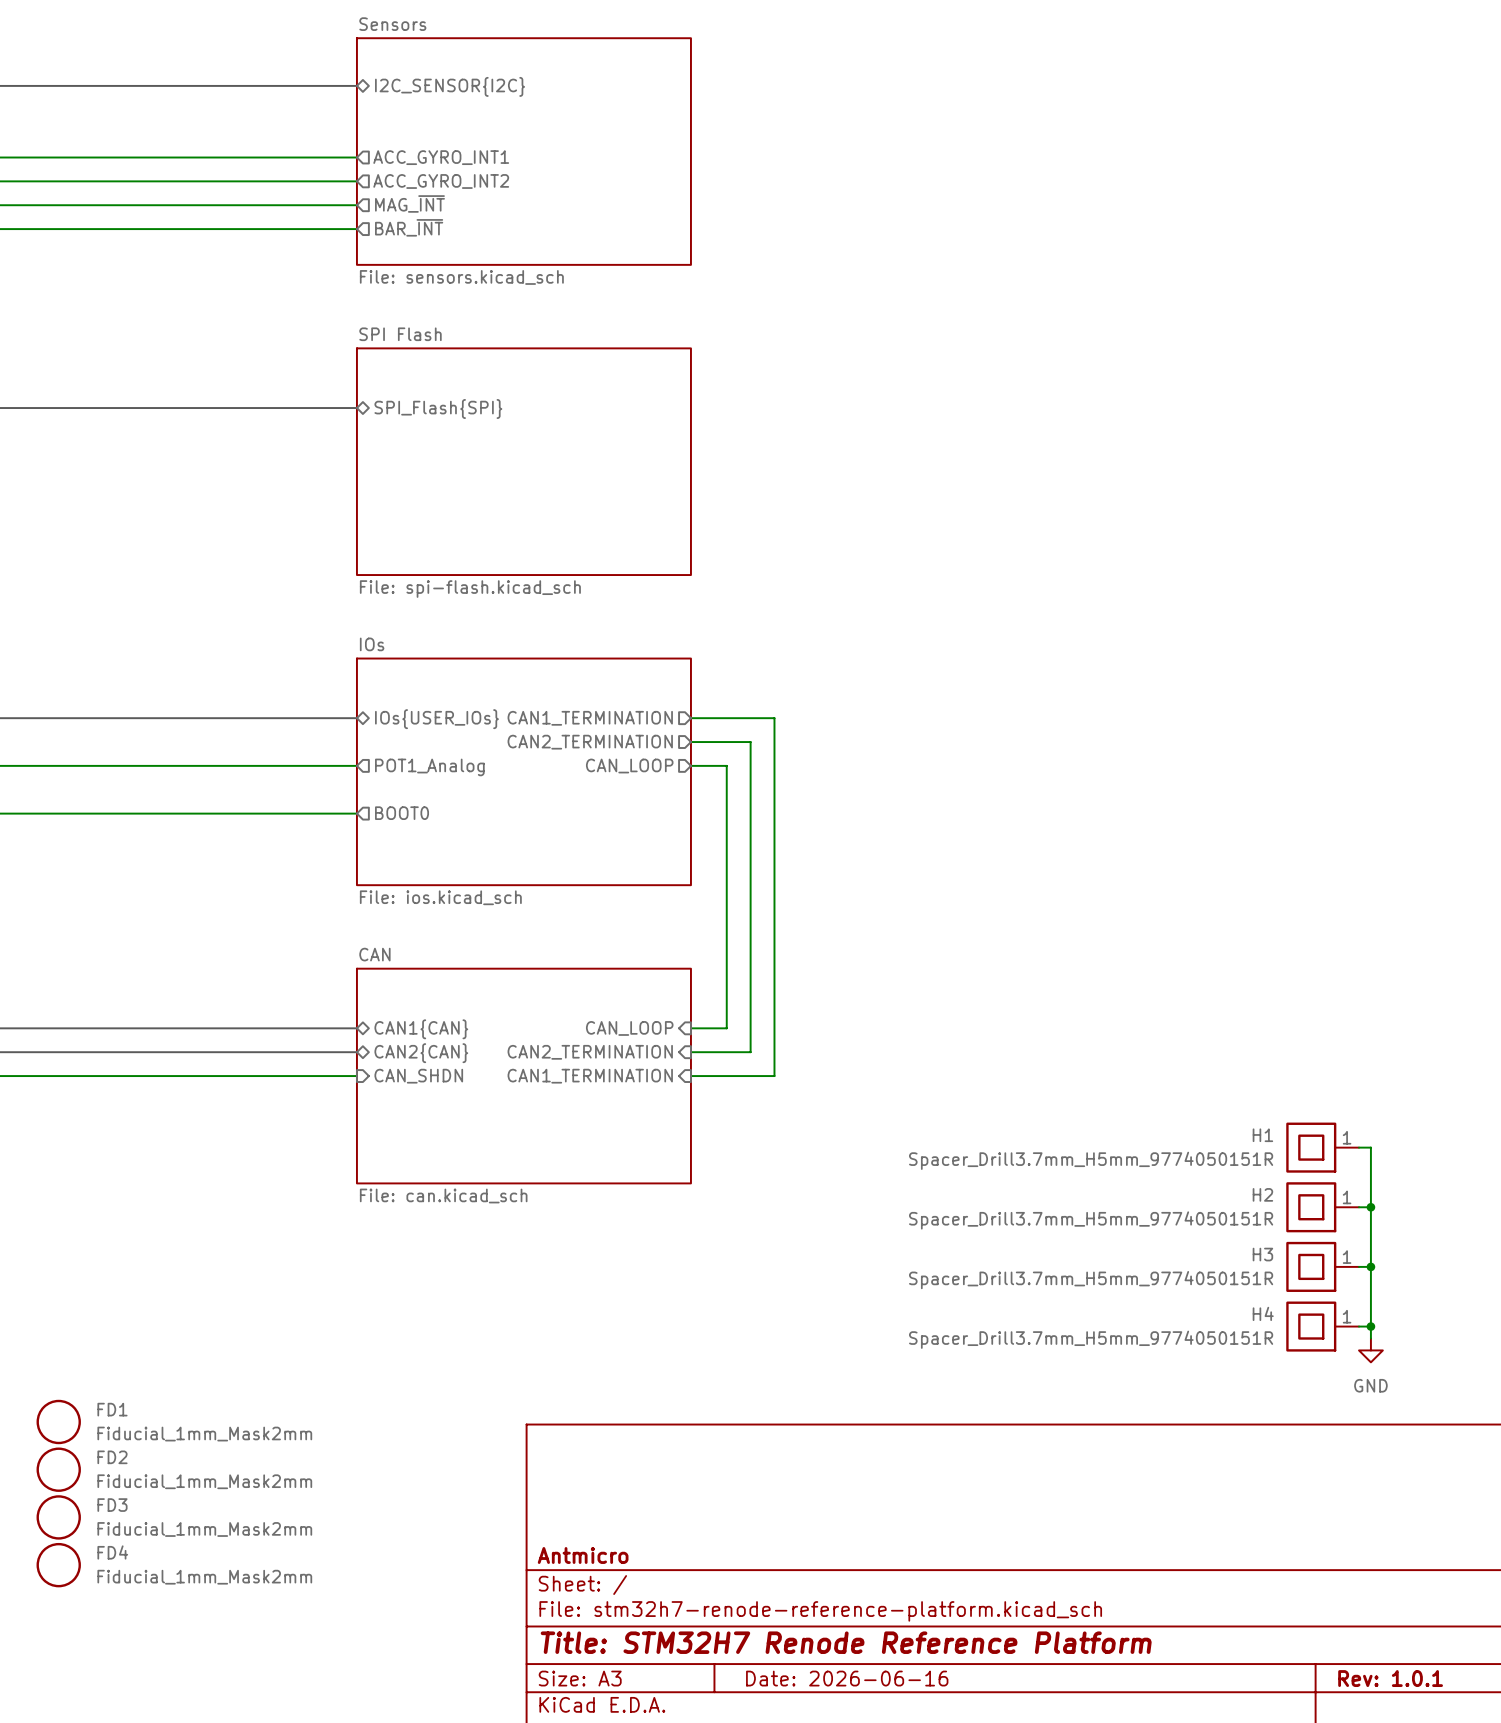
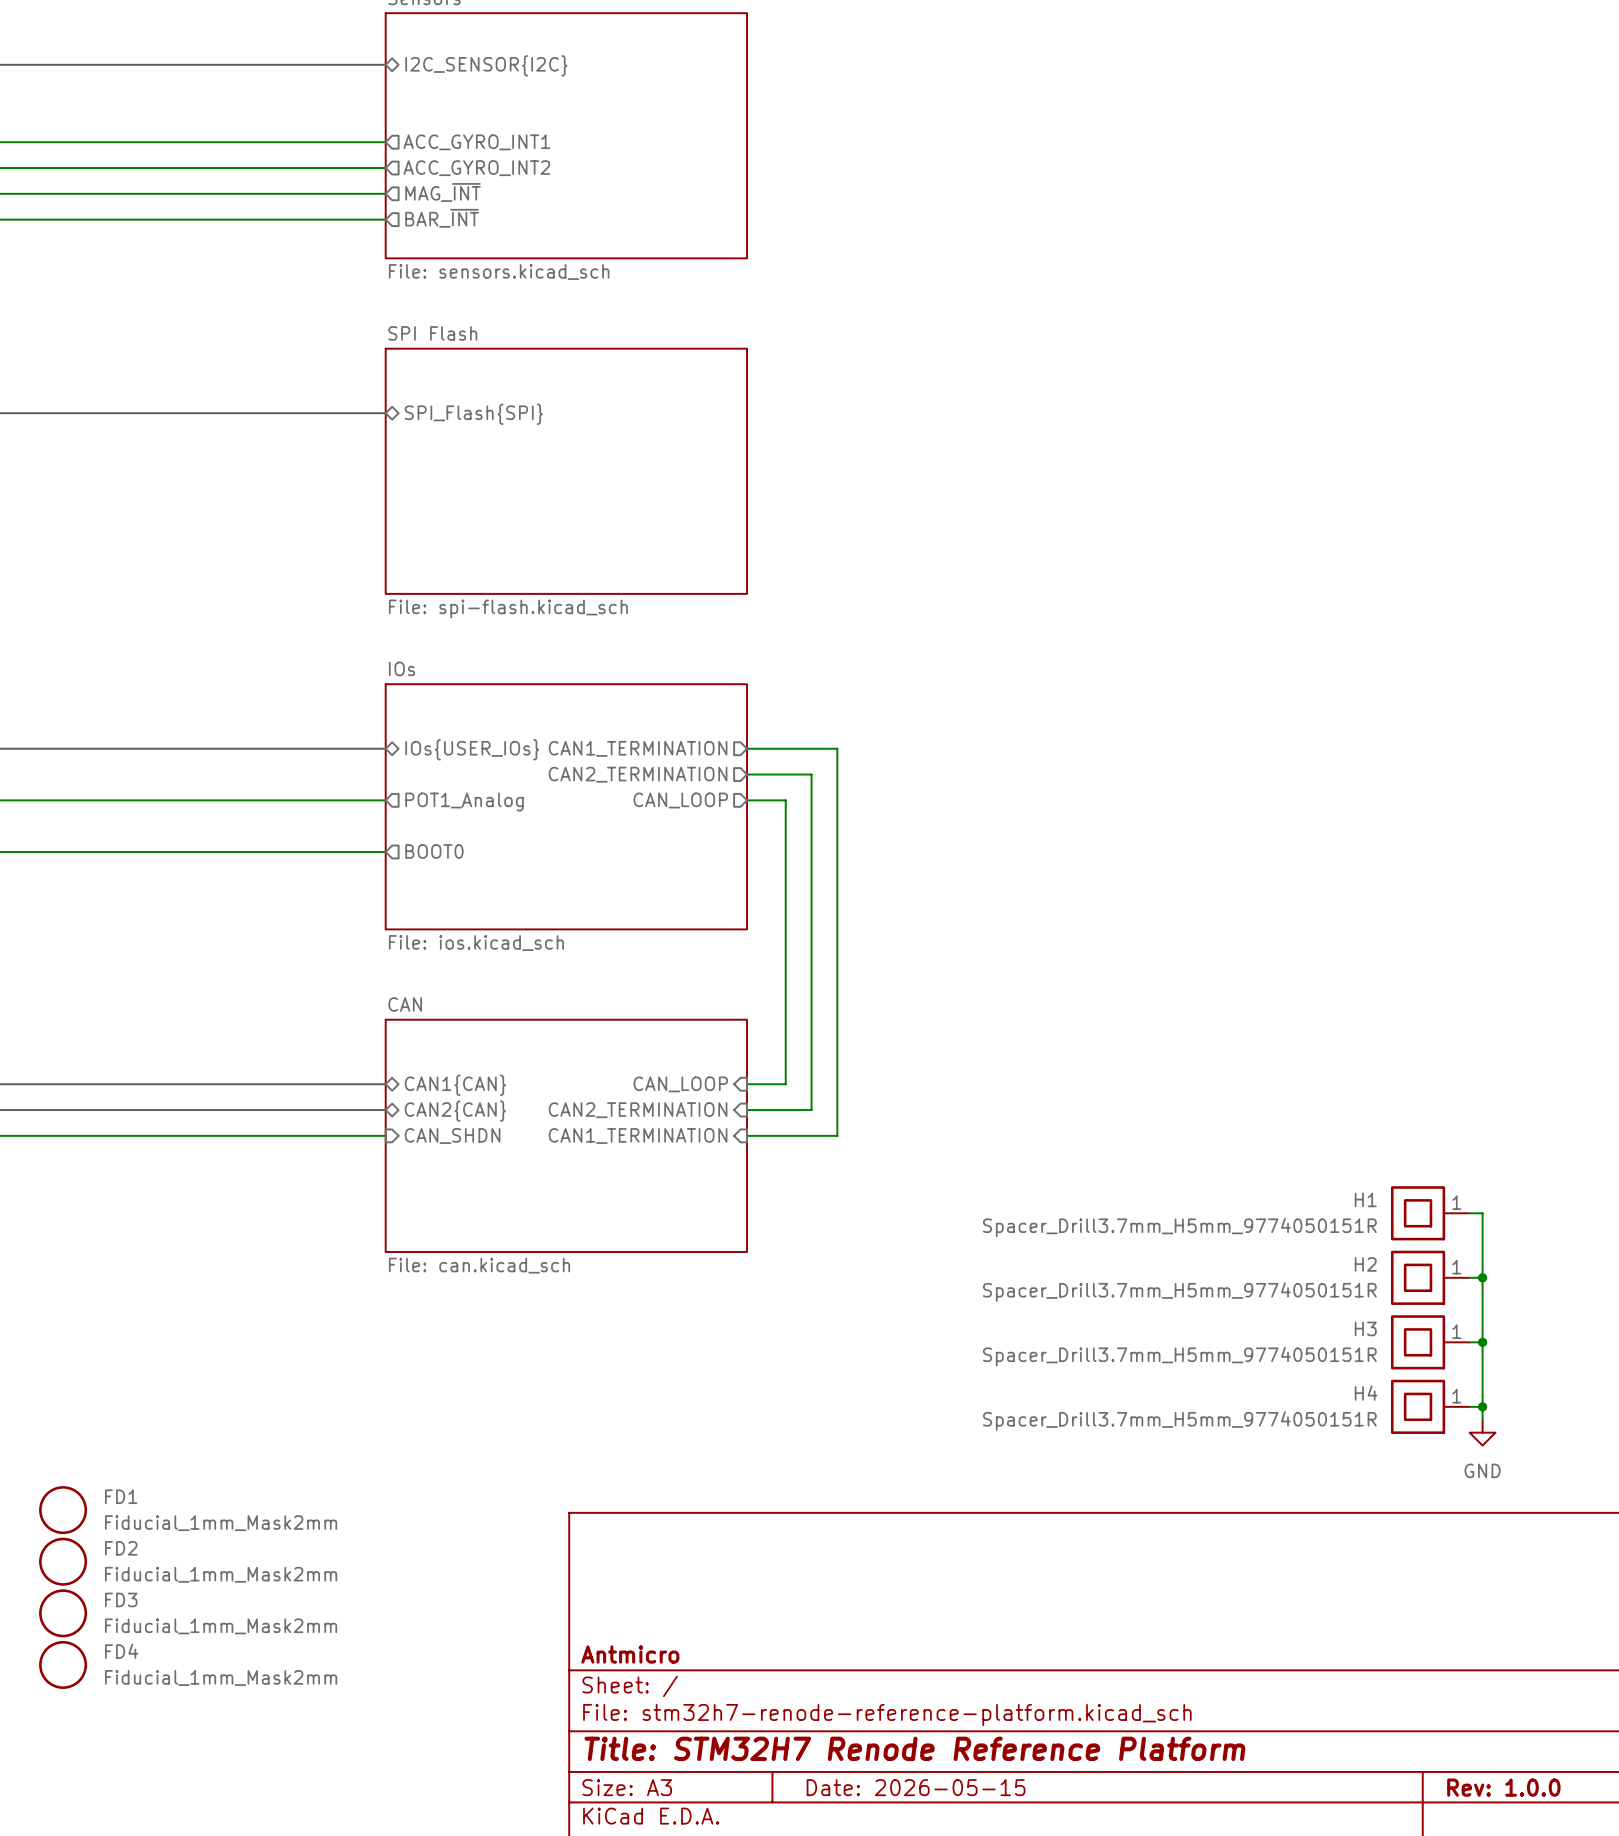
title block: Date: 2026-06-16 (847, 1678) -> Date: 2026-05-15 (916, 1787)
title block: Rev: 1.0.1 (1390, 1678) -> Rev: 1.0.0 (1503, 1787)

